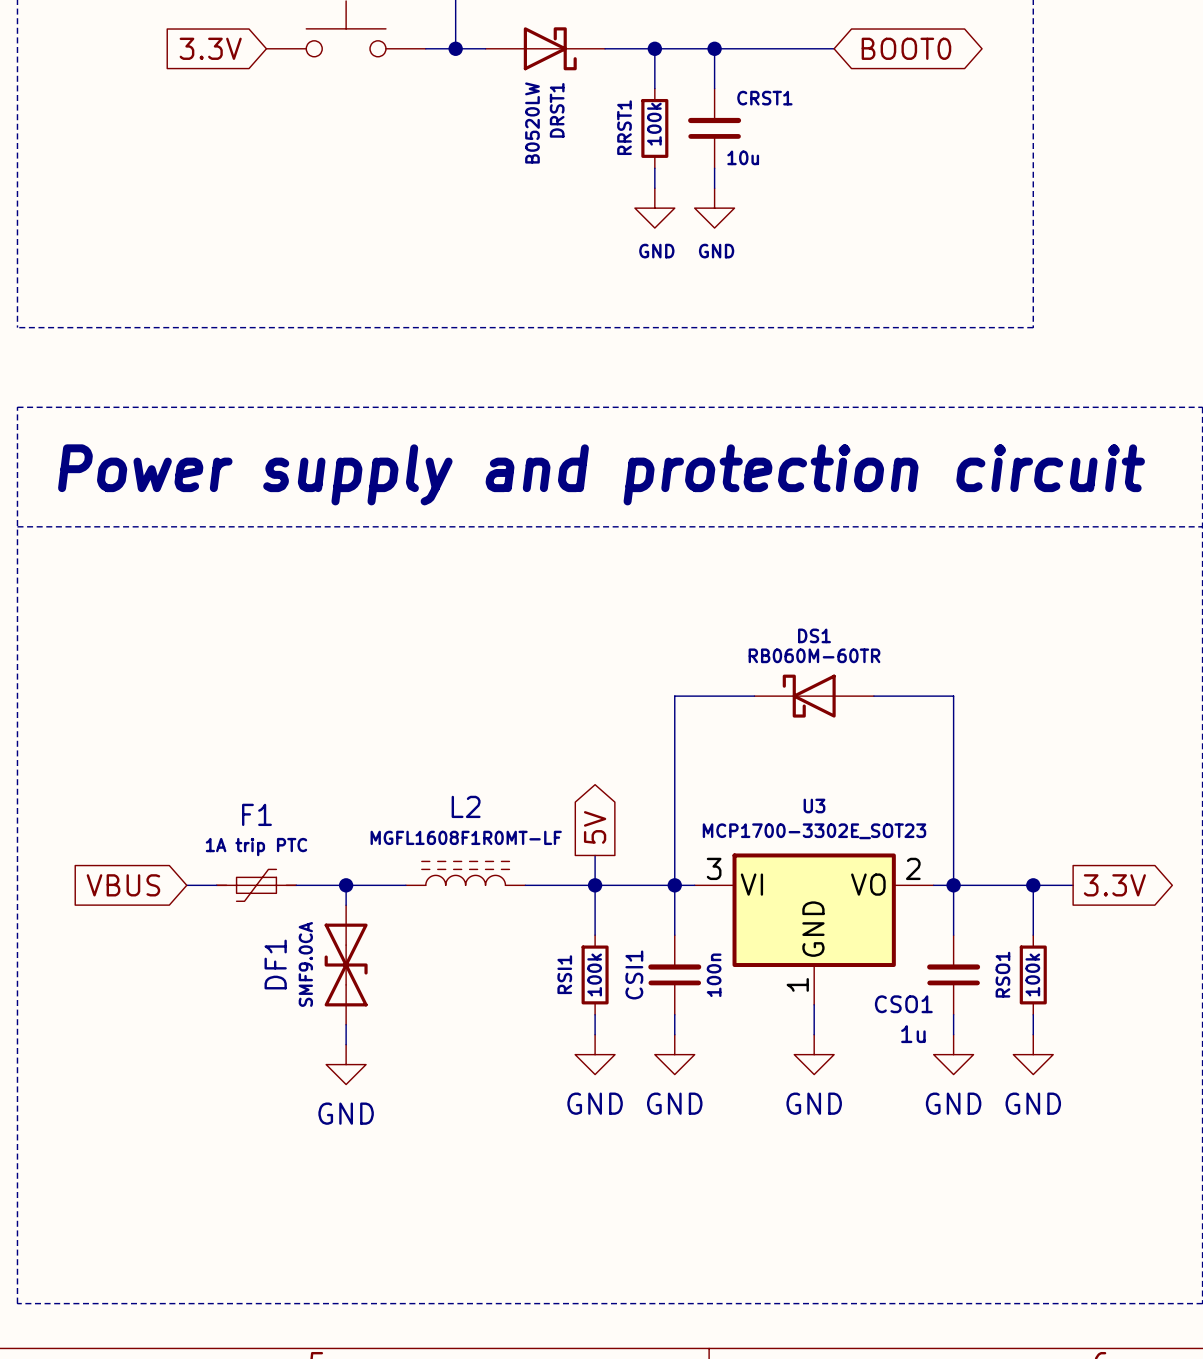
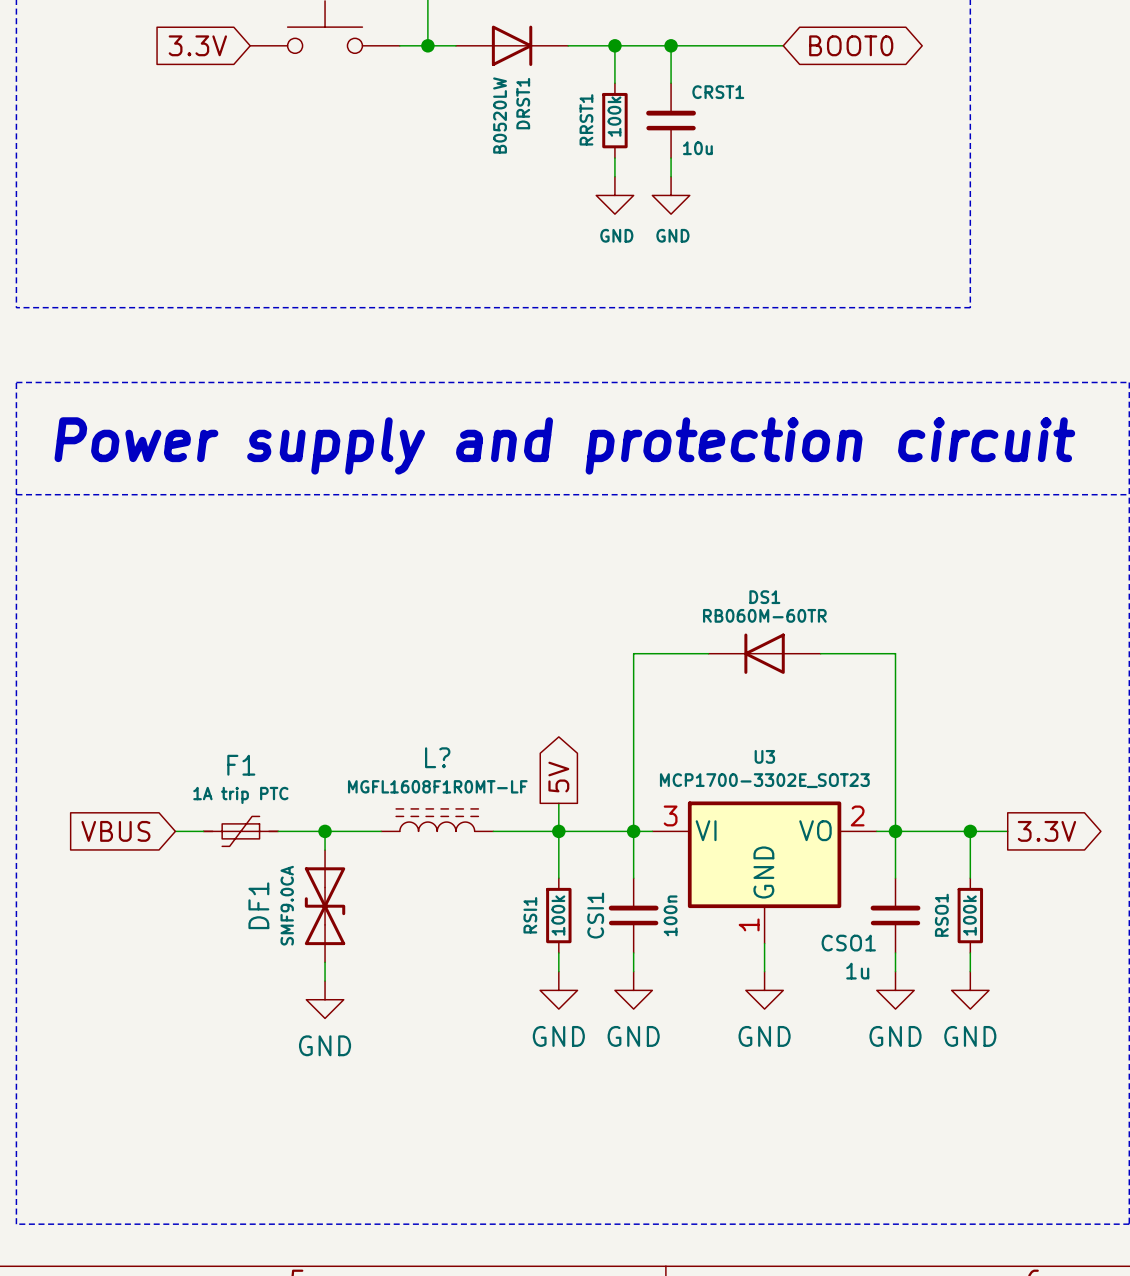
DRST1 symbol: [485, 27, 606, 71] -> [455, 25, 569, 67]
DS1 symbol: [754, 674, 874, 718] -> [708, 633, 821, 674]
L2 name: L2 (466, 806) -> L? (437, 757)

